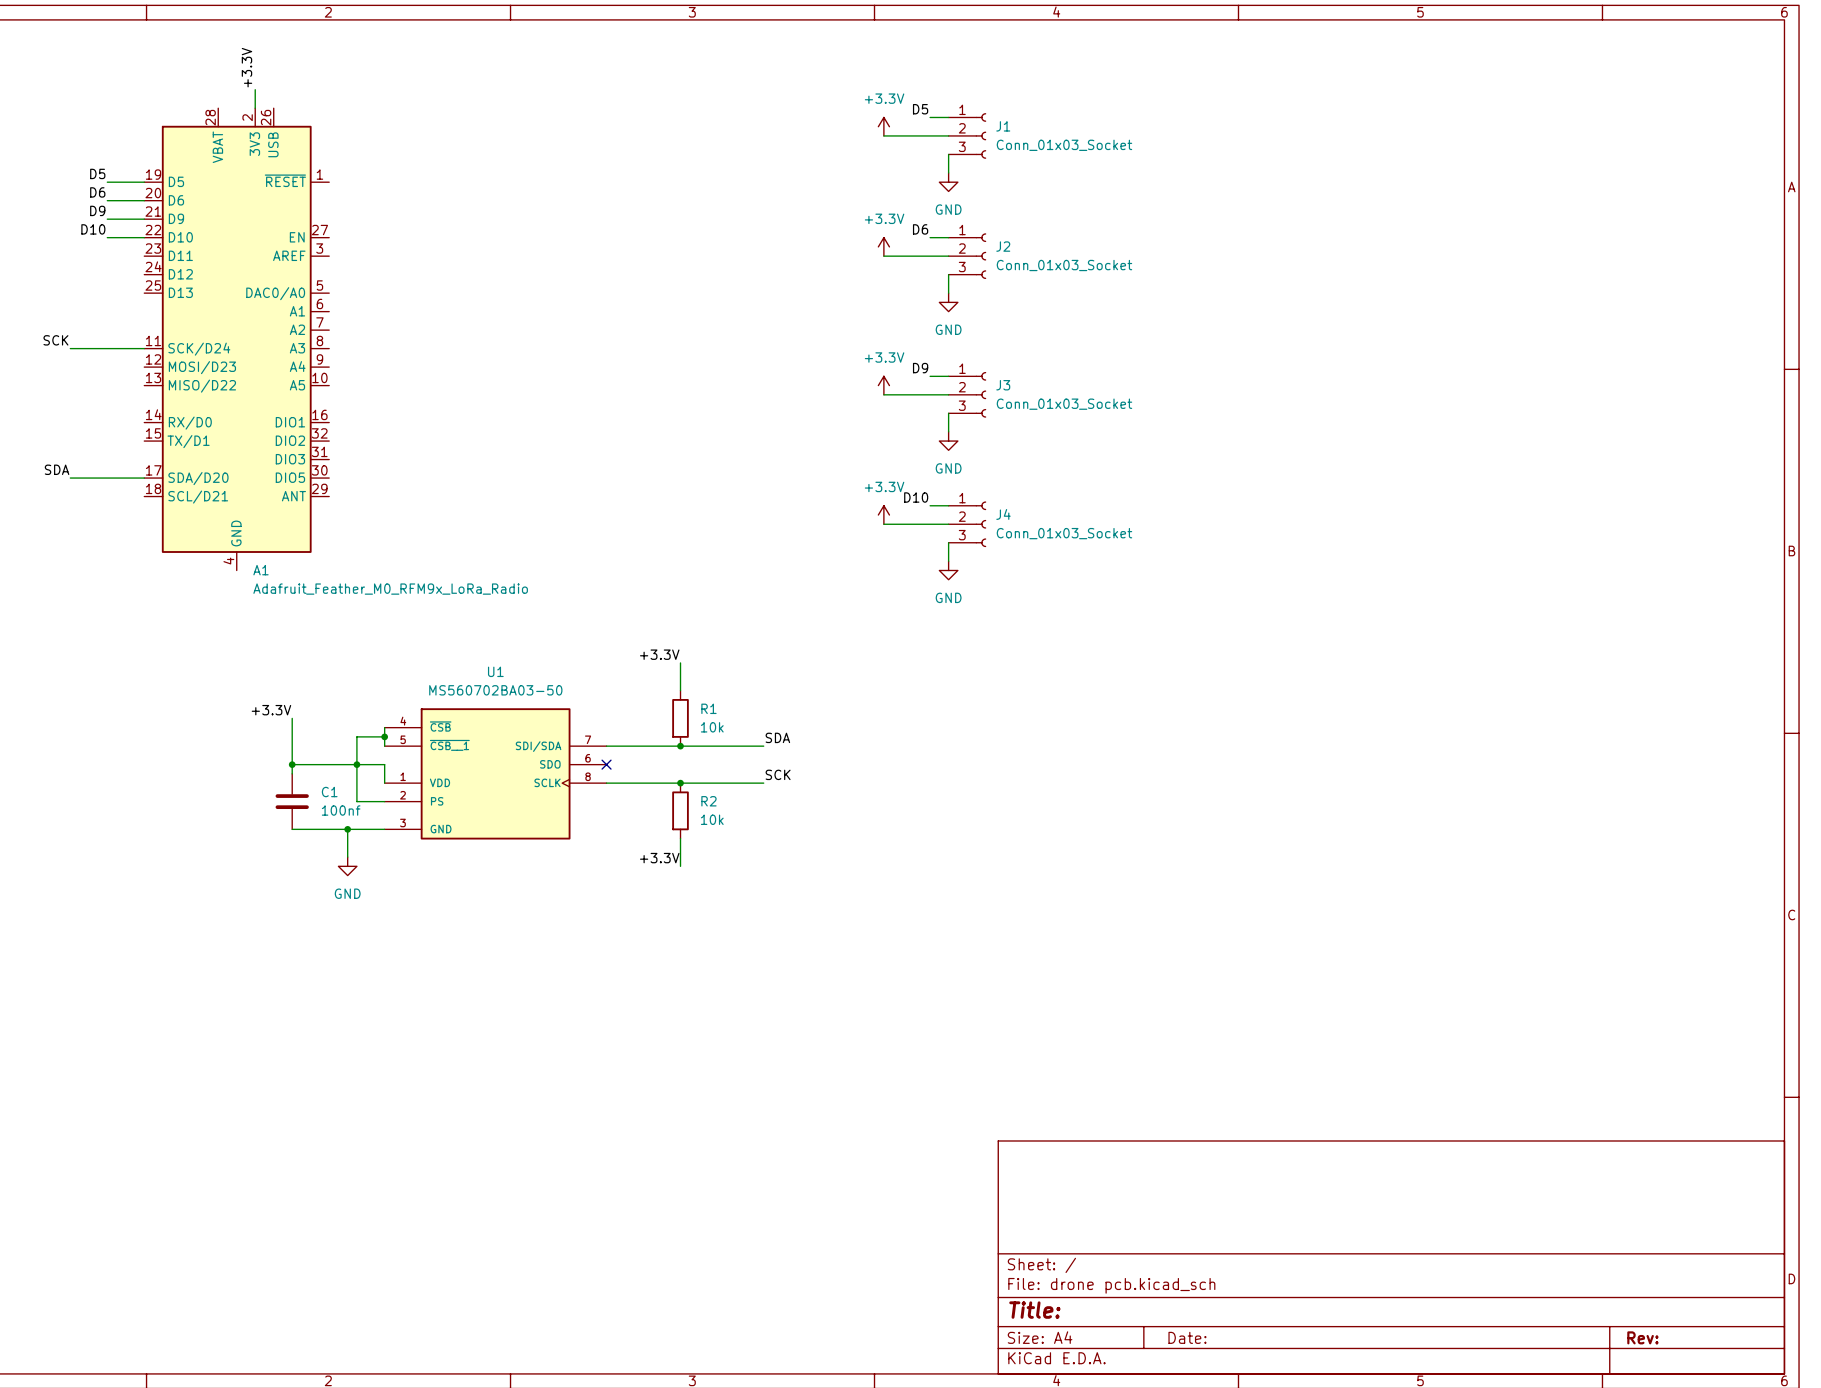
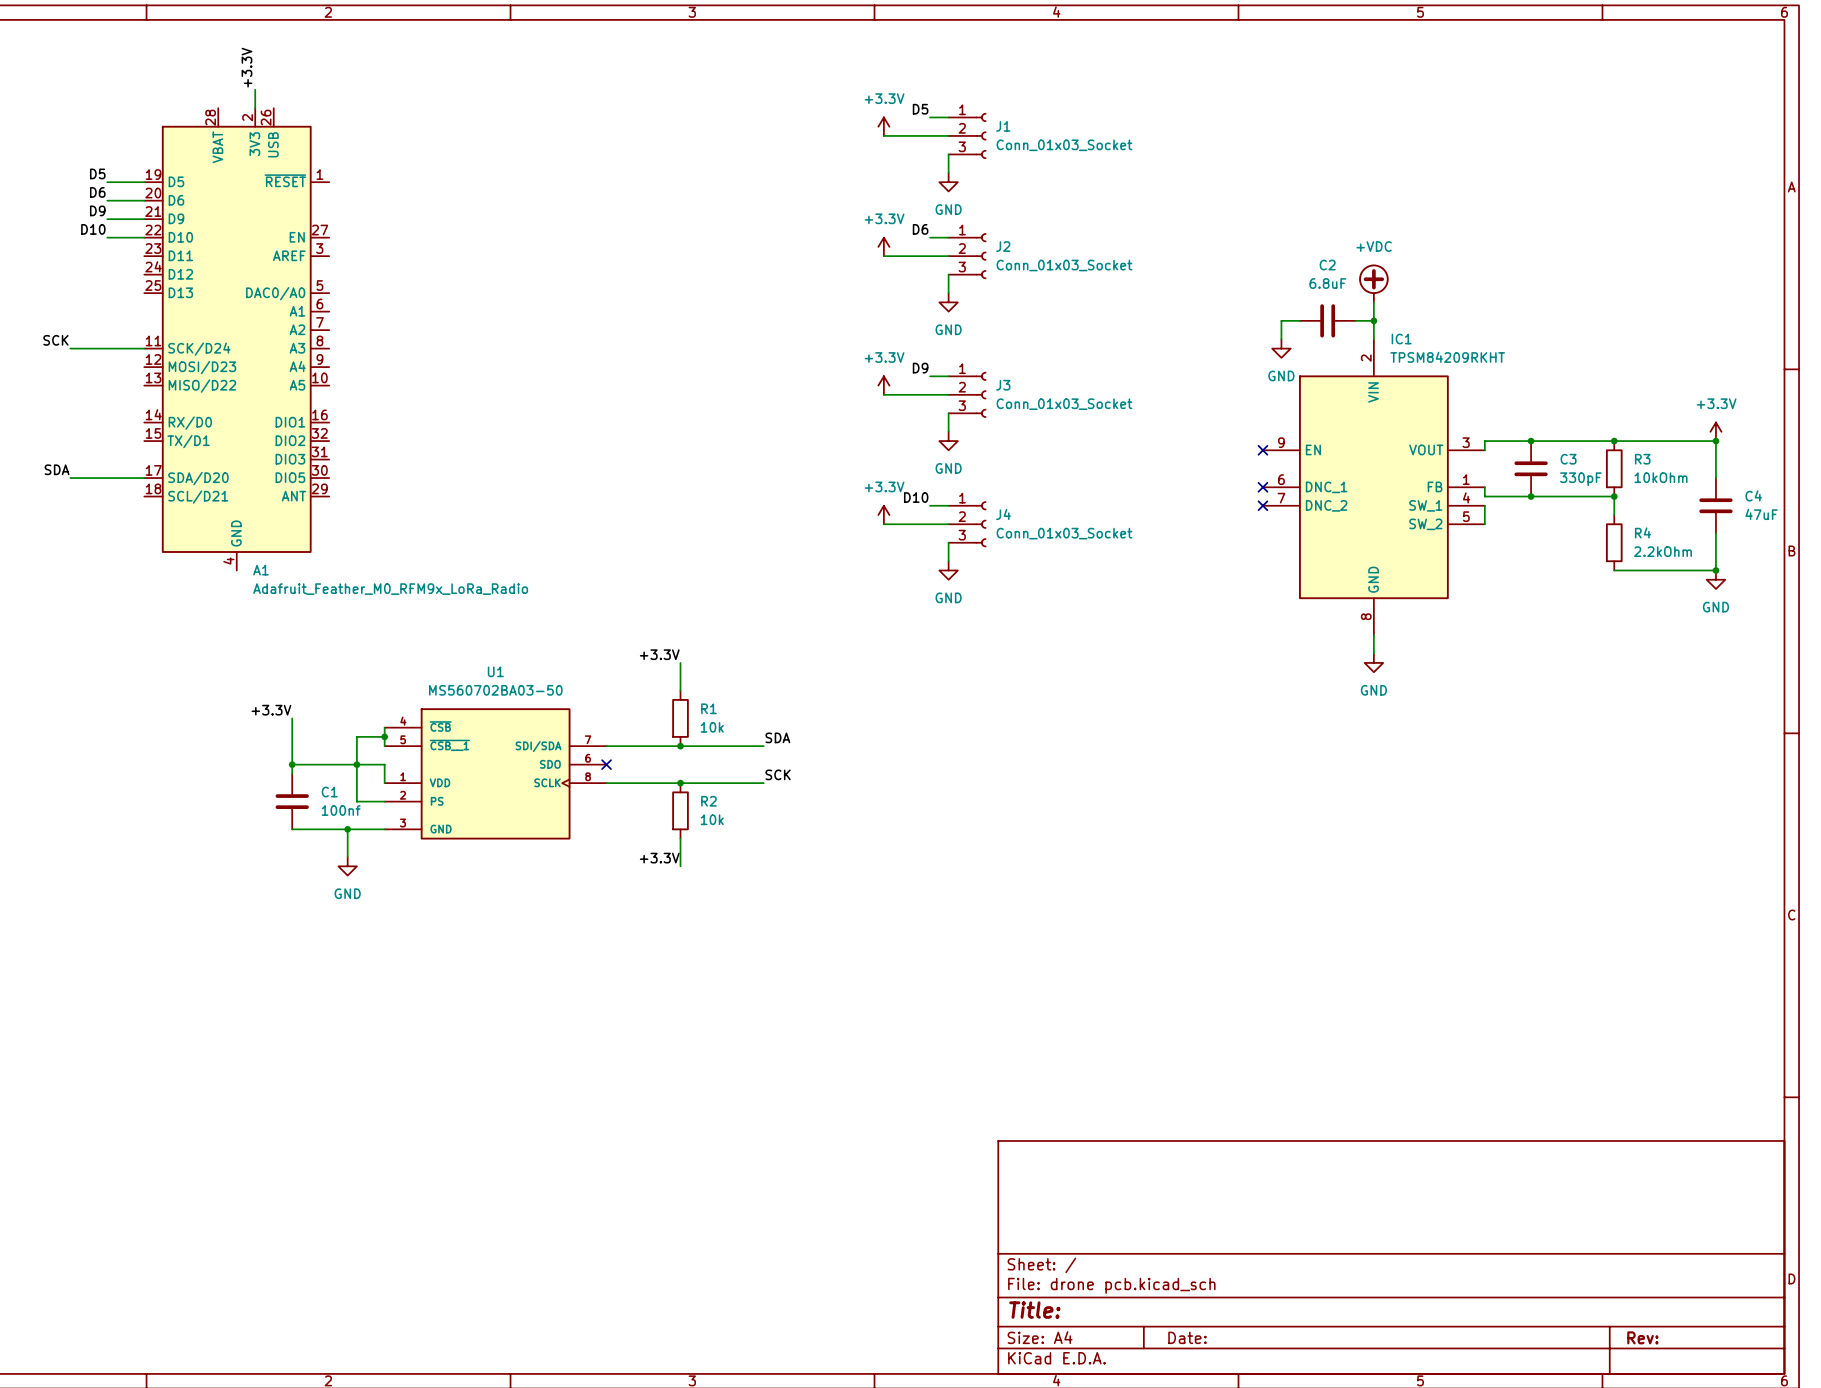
power symbol: none -> +VDC (1373, 283)
wire: none -> (1373, 302) (1373, 339)
wire: none -> (1299, 320) (1281, 320) (1281, 339)
C2: none -> 6.8uF (1327, 320)
wire: none -> (1355, 320) (1373, 320)
junction: none -> (1373, 320)
power symbol: none -> GND (1281, 348)
power symbol: none -> +3.3V (1715, 431)
junction: none -> (1531, 441)
junction: none -> (1614, 441)
junction: none -> (1715, 441)
no-connect mark: none -> (1262, 450)
wire: none -> (1484, 450) (1484, 441) (1715, 441) (1715, 478)
C3: none -> 330pF (1531, 468)
R3: none -> 10kOhm (1614, 468)
no-connect mark: none -> (1262, 487)
IC1: none -> TPSM84209RKHT (1373, 487)
wire: none -> (1484, 487) (1484, 496) (1614, 496) (1614, 515)
junction: none -> (1531, 496)
junction: none -> (1614, 496)
no-connect mark: none -> (1262, 505)
wire: none -> (1484, 505) (1484, 524)
C4: none -> 47uF (1715, 505)
wire: none -> (1715, 533) (1715, 570) (1614, 570)
R4: none -> 2.2kOhm (1614, 542)
junction: none -> (1715, 570)
power symbol: none -> GND (1715, 579)
wire: none -> (1373, 635) (1373, 653)
power symbol: none -> GND (1373, 662)

